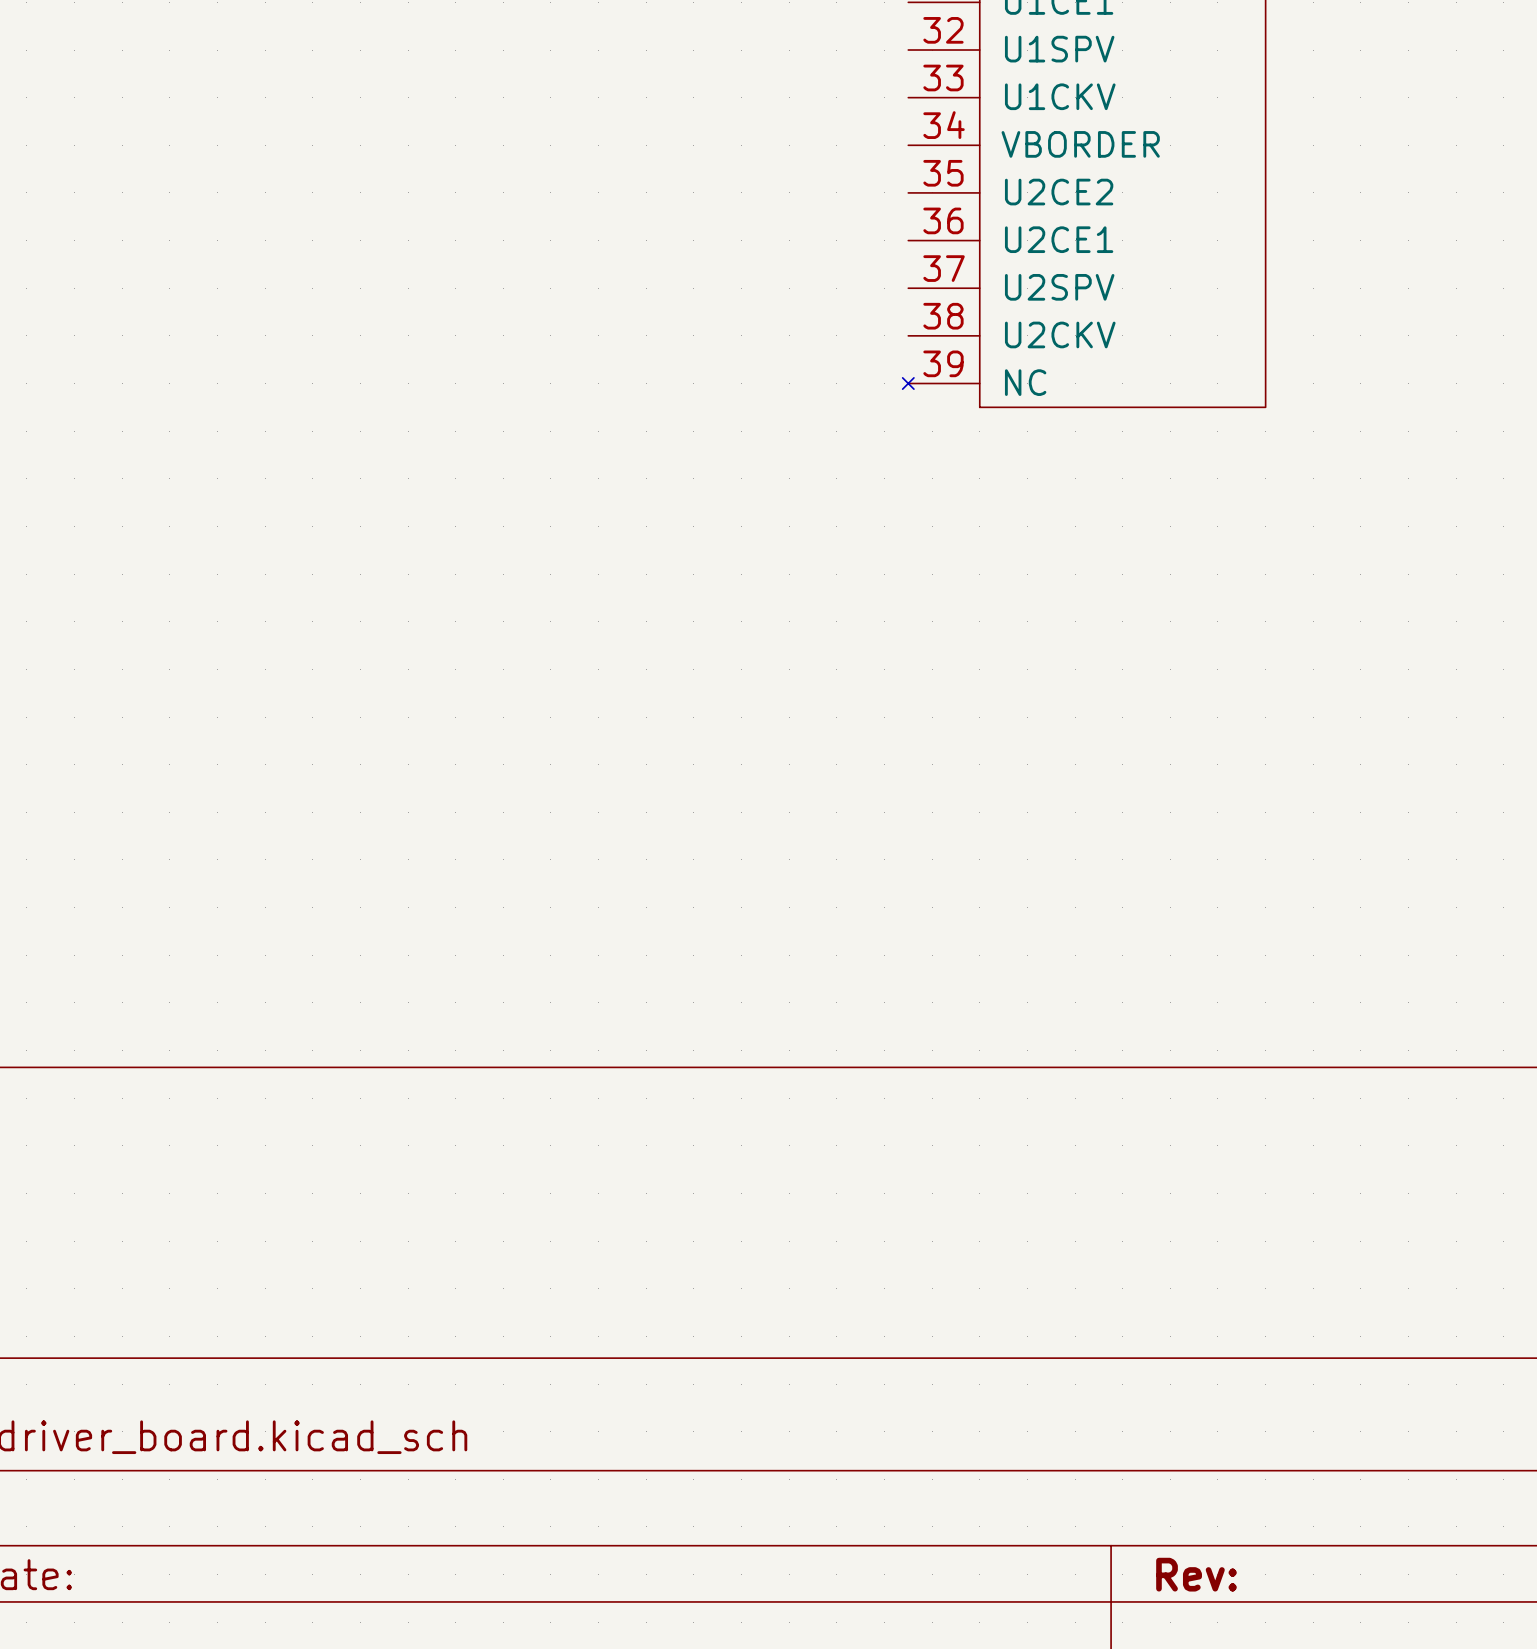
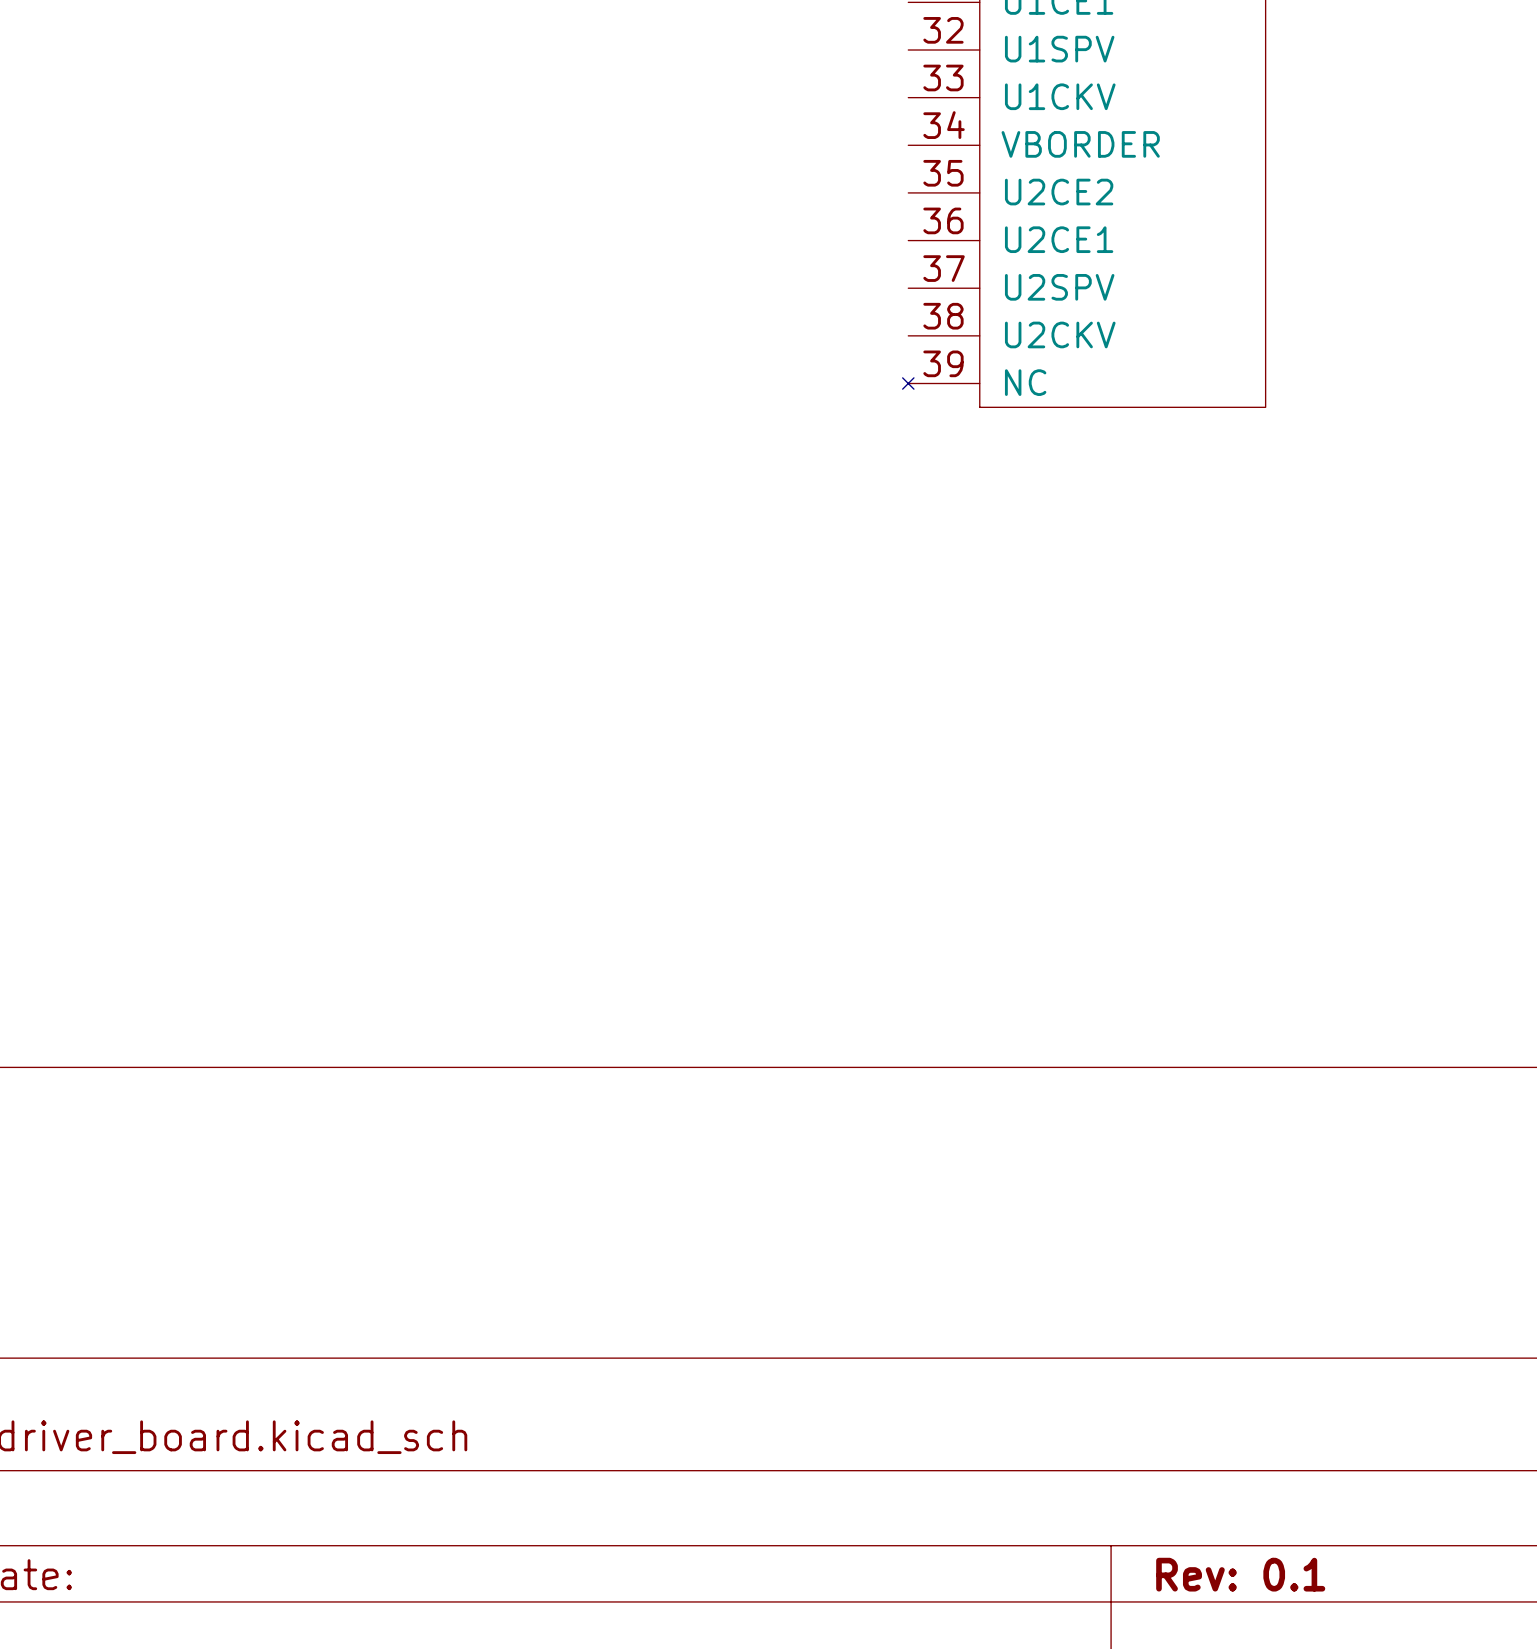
title block: Rev: (1196, 1574) -> Rev: 0.1 (1240, 1574)

